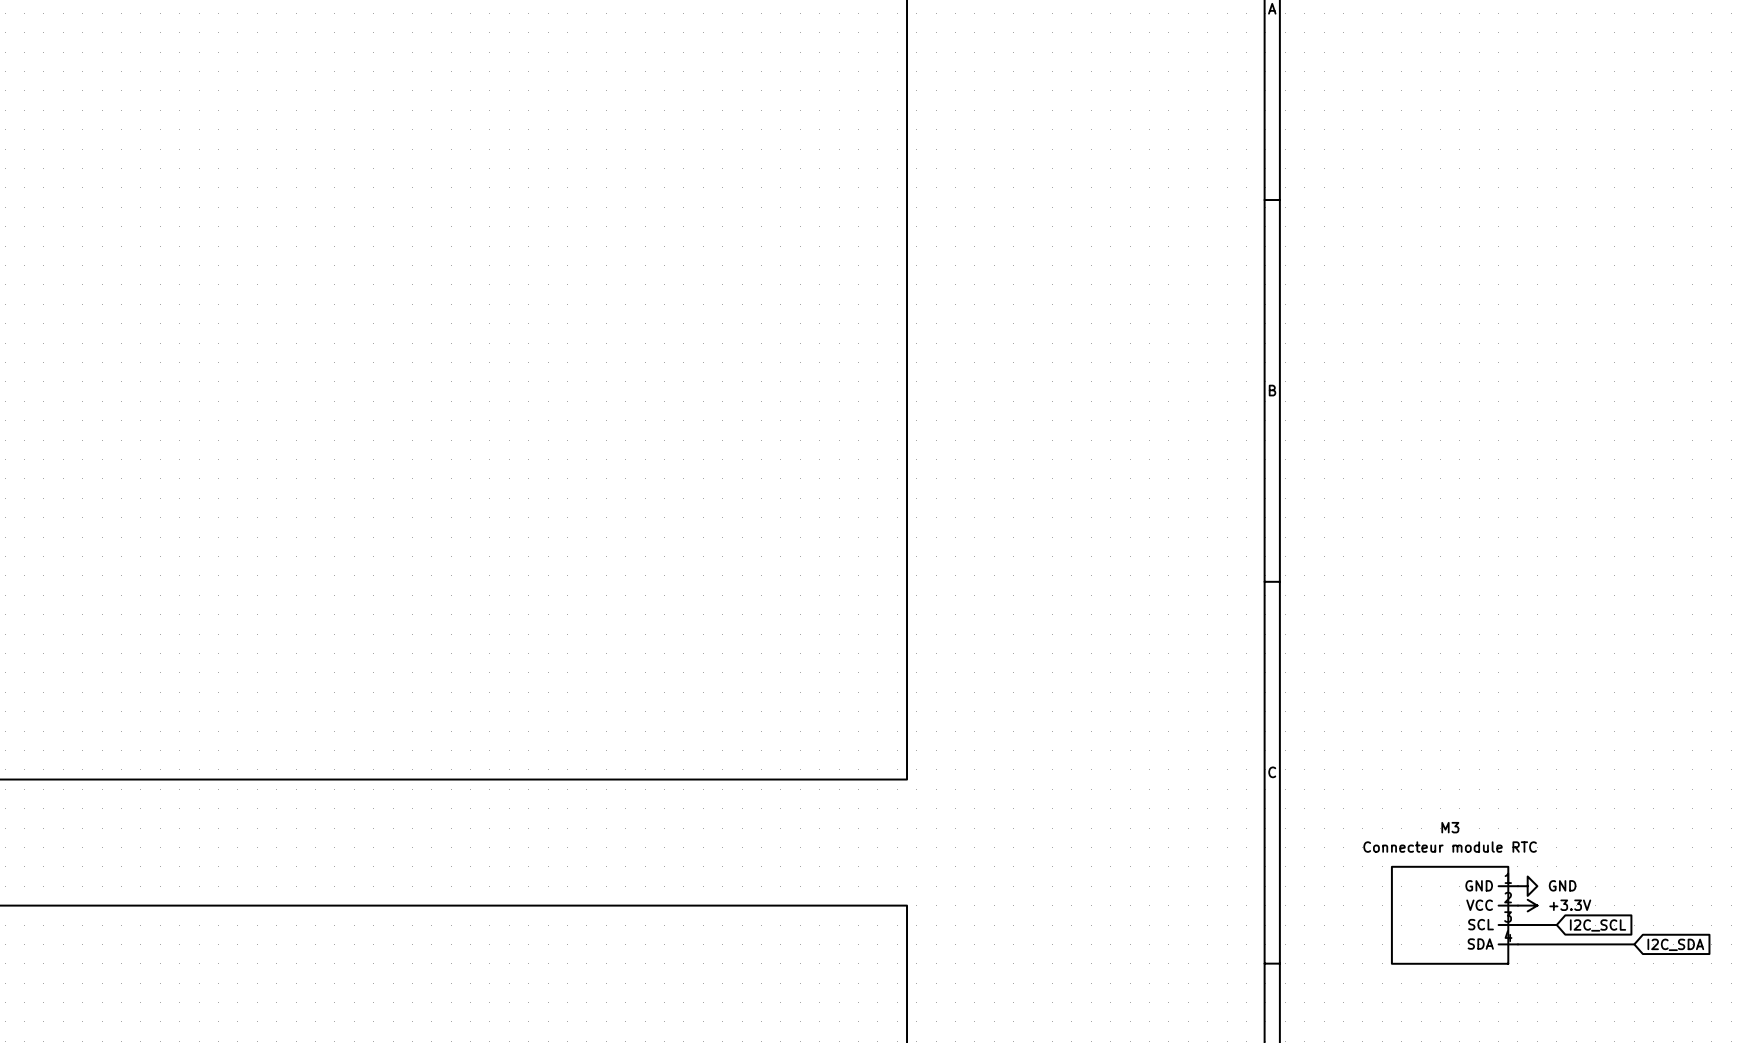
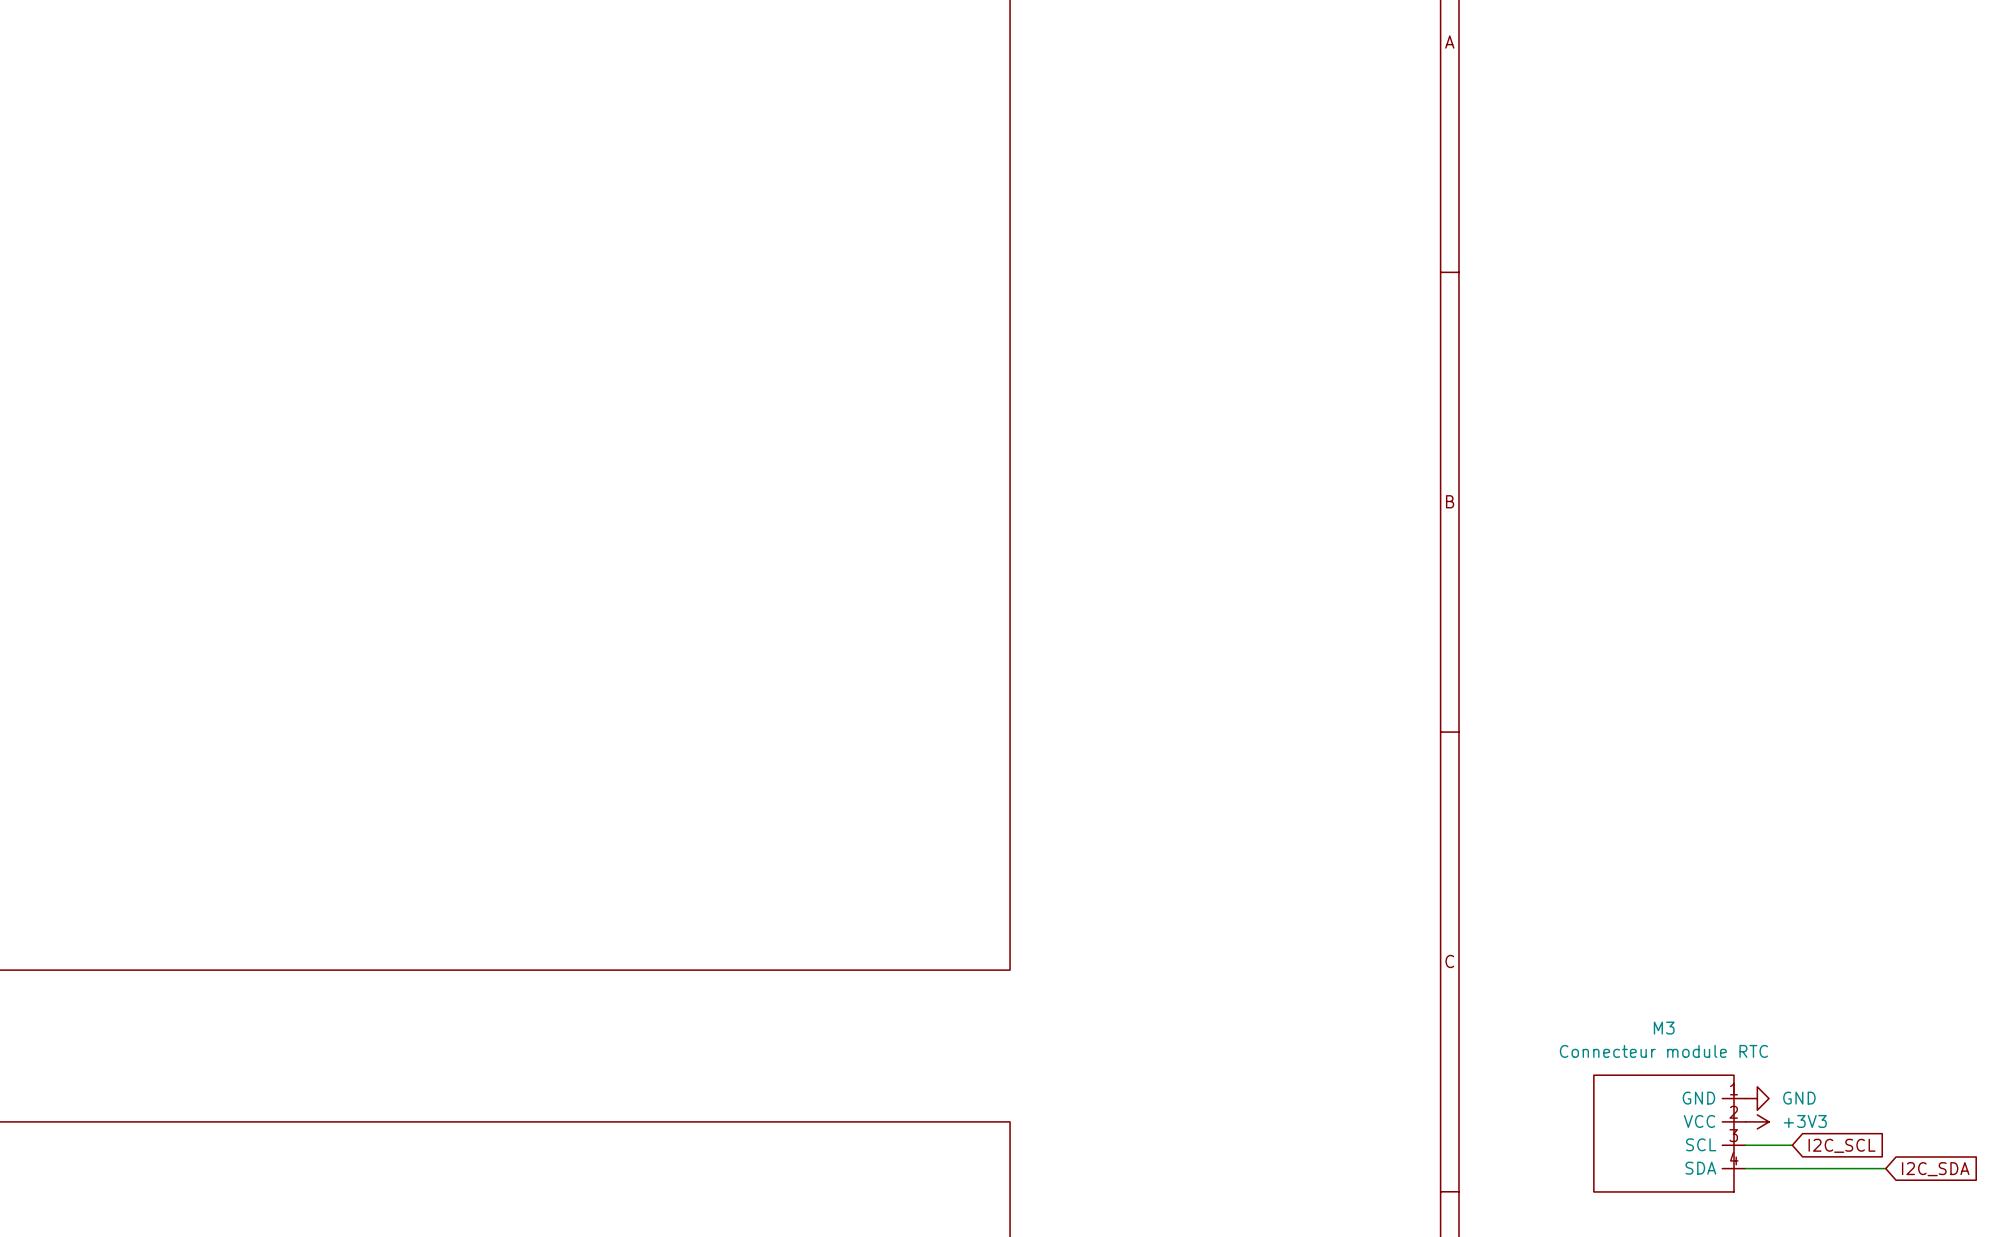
power symbol: +3.3V (1527, 905) -> +3V3 (1757, 1121)

